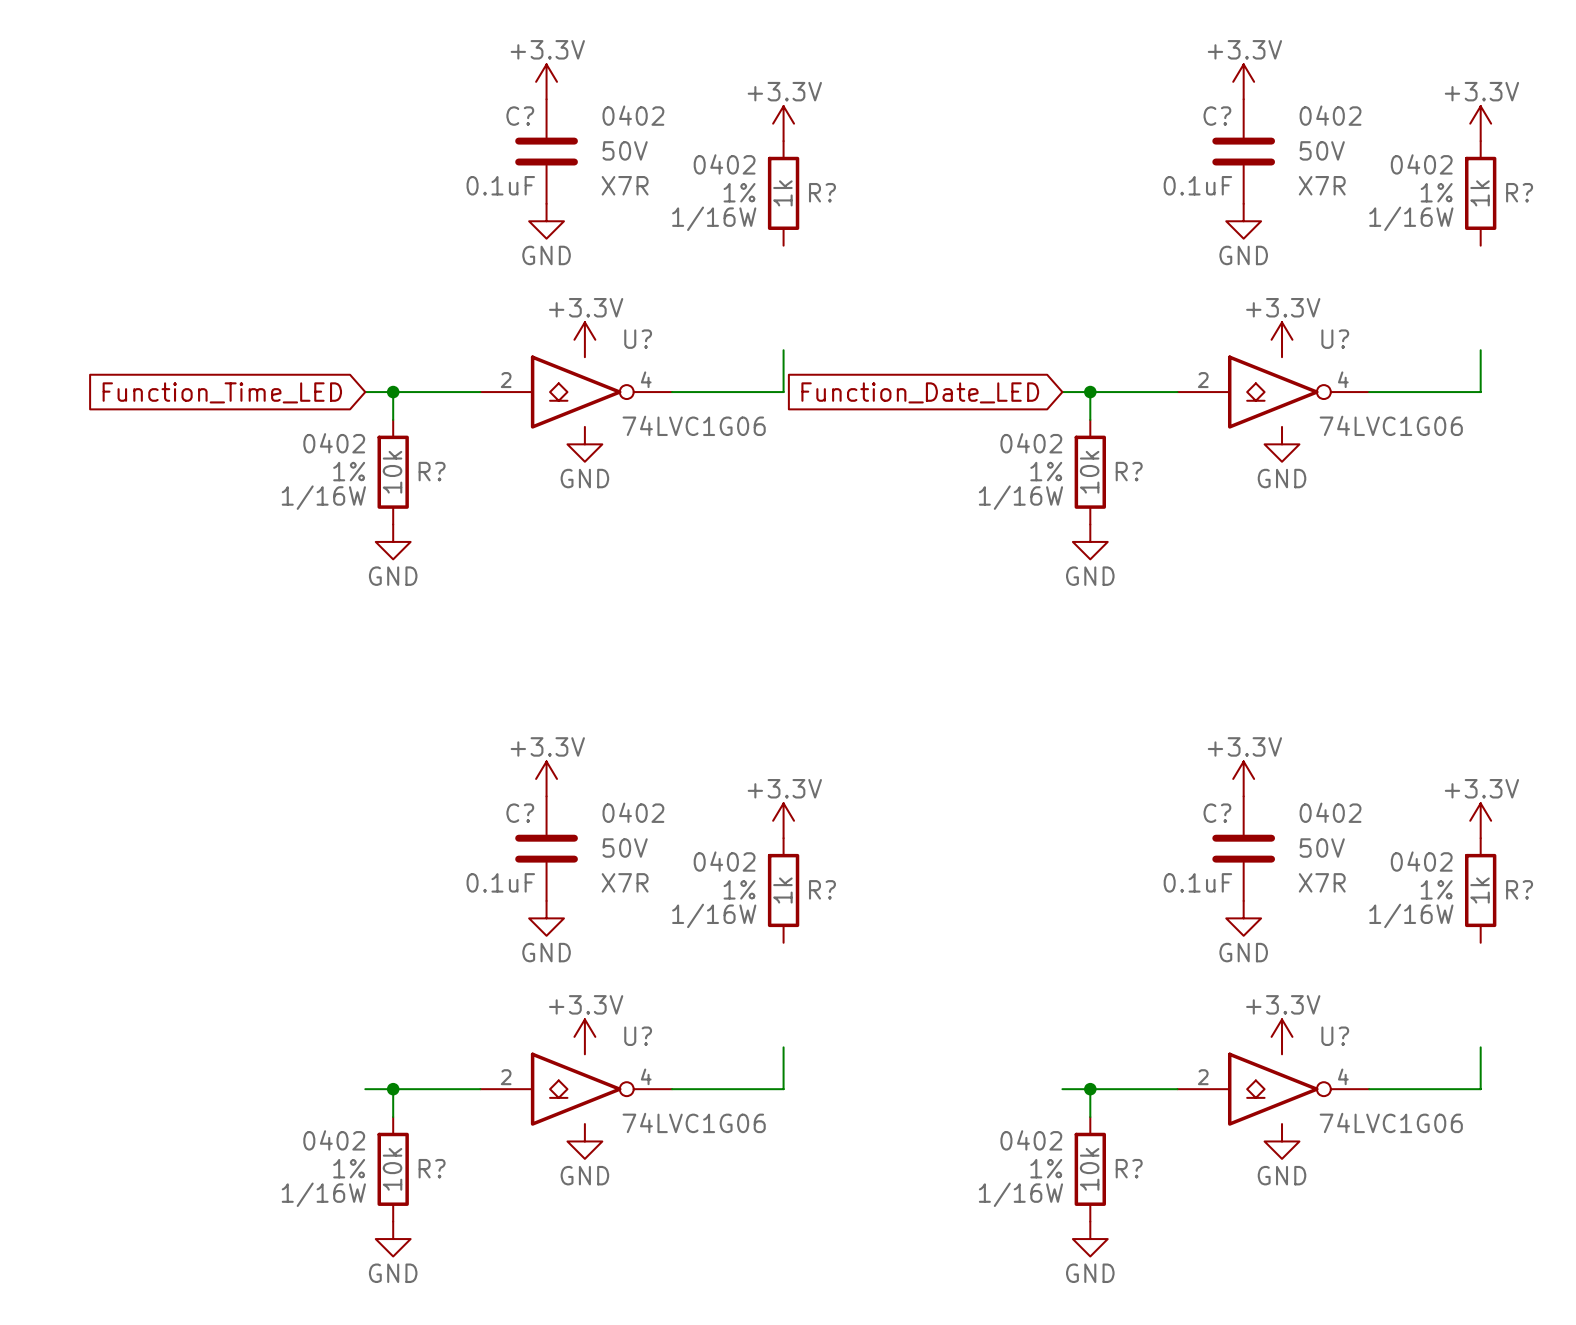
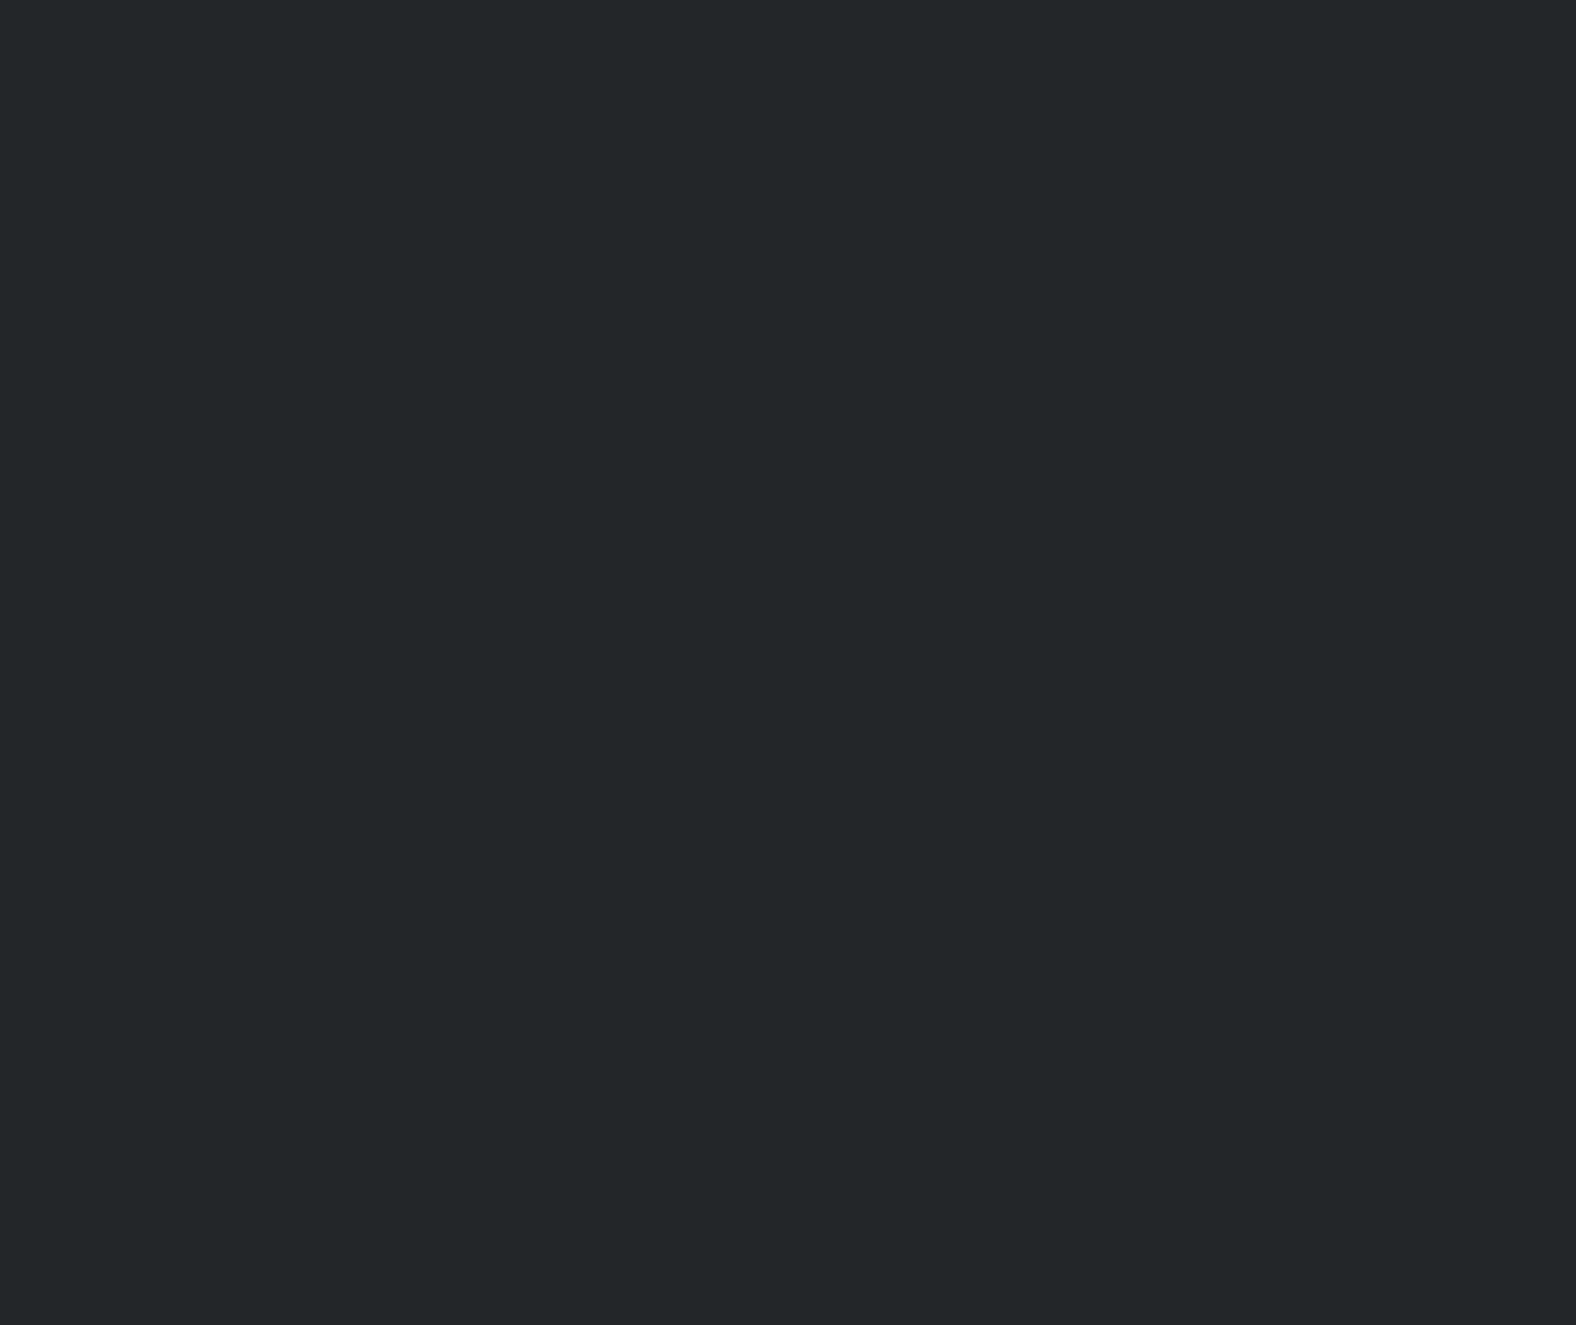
power symbol: +3.3V (546, 81) -> none
power symbol: +3.3V (1243, 81) -> none
power symbol: +3.3V (783, 123) -> none
power symbol: +3.3V (1480, 123) -> none
C?: 0.1uF (546, 151) -> none
C?: 0.1uF (1243, 151) -> none
R?: 1k (783, 193) -> none
R?: 1k (1480, 193) -> none
power symbol: GND (546, 221) -> none
power symbol: GND (1243, 221) -> none
power symbol: +3.3V (584, 339) -> none
power symbol: +3.3V (1282, 339) -> none
wire: (783, 350) (783, 392) (672, 392) -> none
wire: (1480, 350) (1480, 392) (1369, 392) -> none
global label: Function_Time_LED (222, 392) -> none
wire: (365, 392) (480, 392) -> none
wire: (393, 392) (393, 419) -> none
junction: (393, 392) -> none
U?: 74LVC1G06 (576, 392) -> none
global label: Function_Date_LED (920, 392) -> none
wire: (1062, 392) (1177, 392) -> none
wire: (1090, 392) (1090, 419) -> none
junction: (1090, 392) -> none
U?: 74LVC1G06 (1273, 392) -> none
power symbol: GND (584, 444) -> none
power symbol: GND (1282, 444) -> none
R?: 10k (393, 472) -> none
R?: 10k (1090, 472) -> none
power symbol: GND (393, 541) -> none
power symbol: GND (1090, 541) -> none
power symbol: +3.3V (546, 778) -> none
power symbol: +3.3V (1243, 778) -> none
power symbol: +3.3V (783, 820) -> none
power symbol: +3.3V (1480, 820) -> none
C?: 0.1uF (546, 848) -> none
C?: 0.1uF (1243, 848) -> none
R?: 1k (783, 890) -> none
R?: 1k (1480, 890) -> none
power symbol: GND (546, 918) -> none
power symbol: GND (1243, 918) -> none
power symbol: +3.3V (584, 1036) -> none
power symbol: +3.3V (1282, 1036) -> none
wire: (783, 1047) (783, 1089) (672, 1089) -> none
wire: (1480, 1047) (1480, 1089) (1369, 1089) -> none
wire: (365, 1089) (480, 1089) -> none
wire: (393, 1089) (393, 1117) -> none
junction: (393, 1089) -> none
U?: 74LVC1G06 (576, 1089) -> none
wire: (1062, 1089) (1177, 1089) -> none
wire: (1090, 1089) (1090, 1117) -> none
junction: (1090, 1089) -> none
U?: 74LVC1G06 (1273, 1089) -> none
power symbol: GND (584, 1141) -> none
power symbol: GND (1282, 1141) -> none
R?: 10k (393, 1169) -> none
R?: 10k (1090, 1169) -> none
power symbol: GND (393, 1239) -> none
power symbol: GND (1090, 1239) -> none

